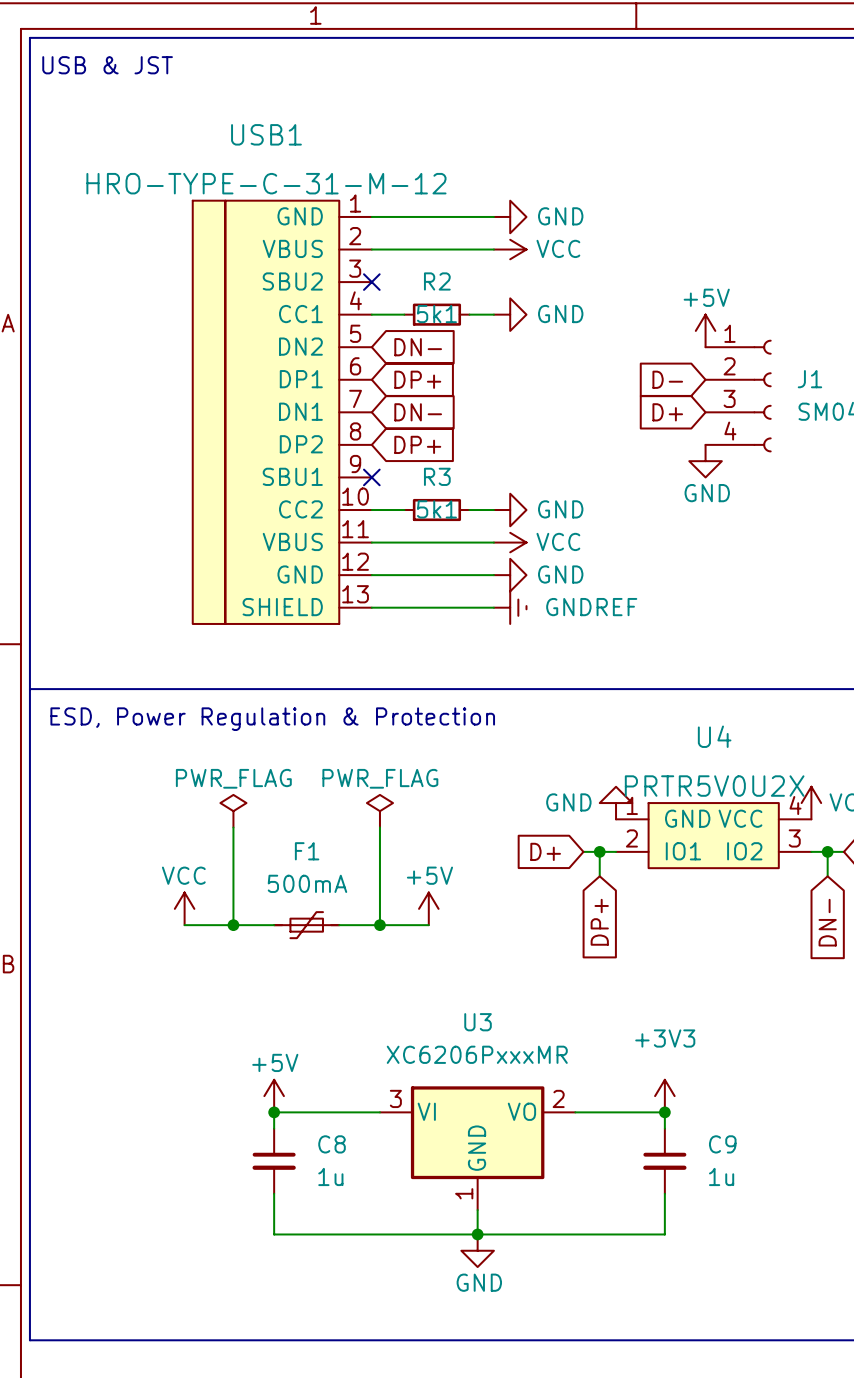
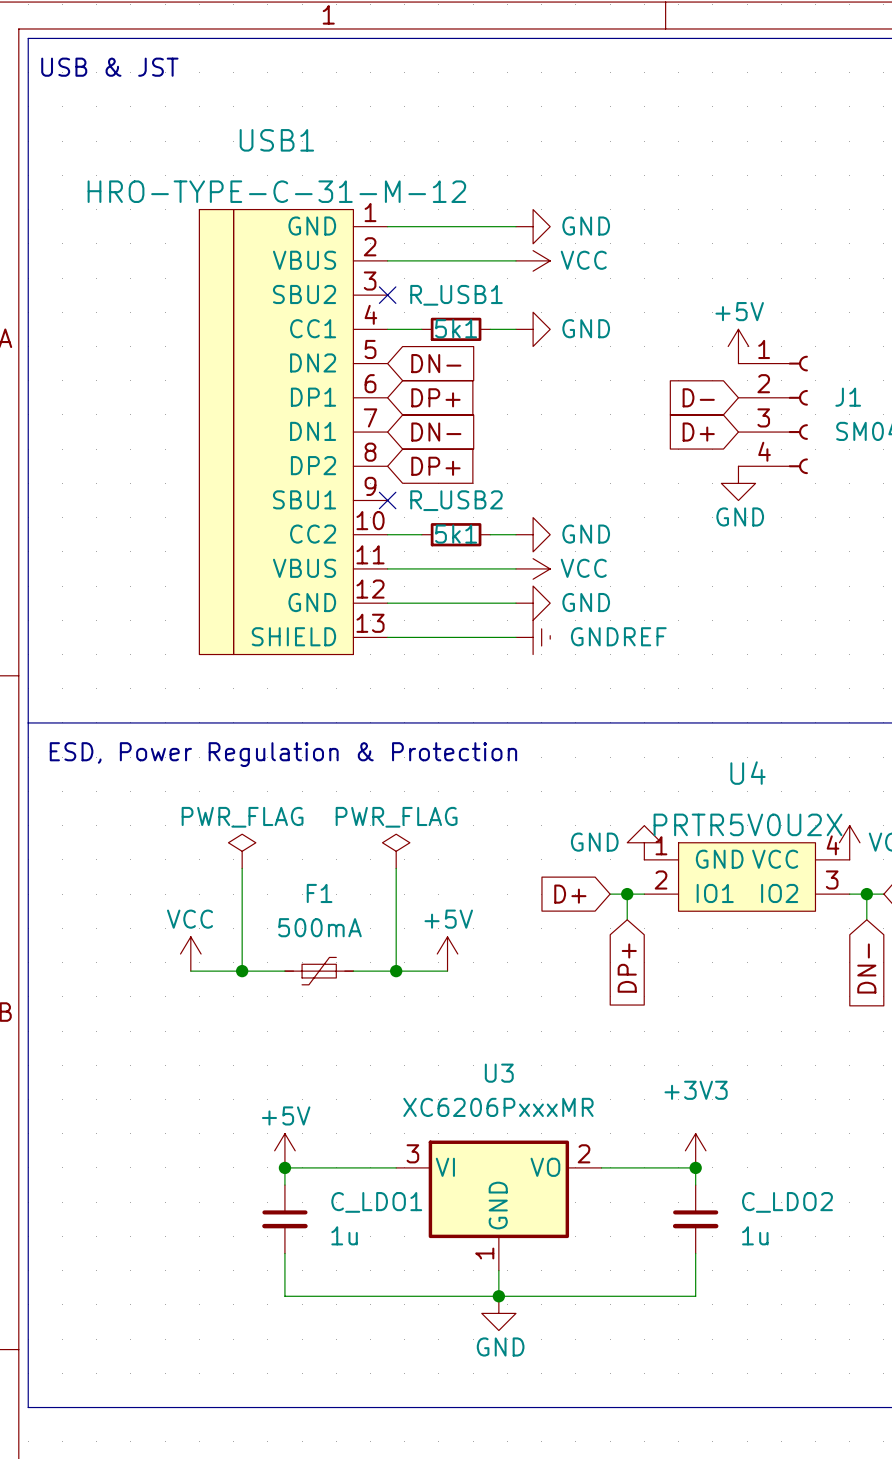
R2 name: R2 (437, 281) -> R_USB1 (456, 295)
R3 name: R3 (437, 476) -> R_USB2 (456, 500)
C8 name: C8 (332, 1144) -> C_LDO1 (376, 1202)
C9 name: C9 (722, 1144) -> C_LDO2 (787, 1202)

